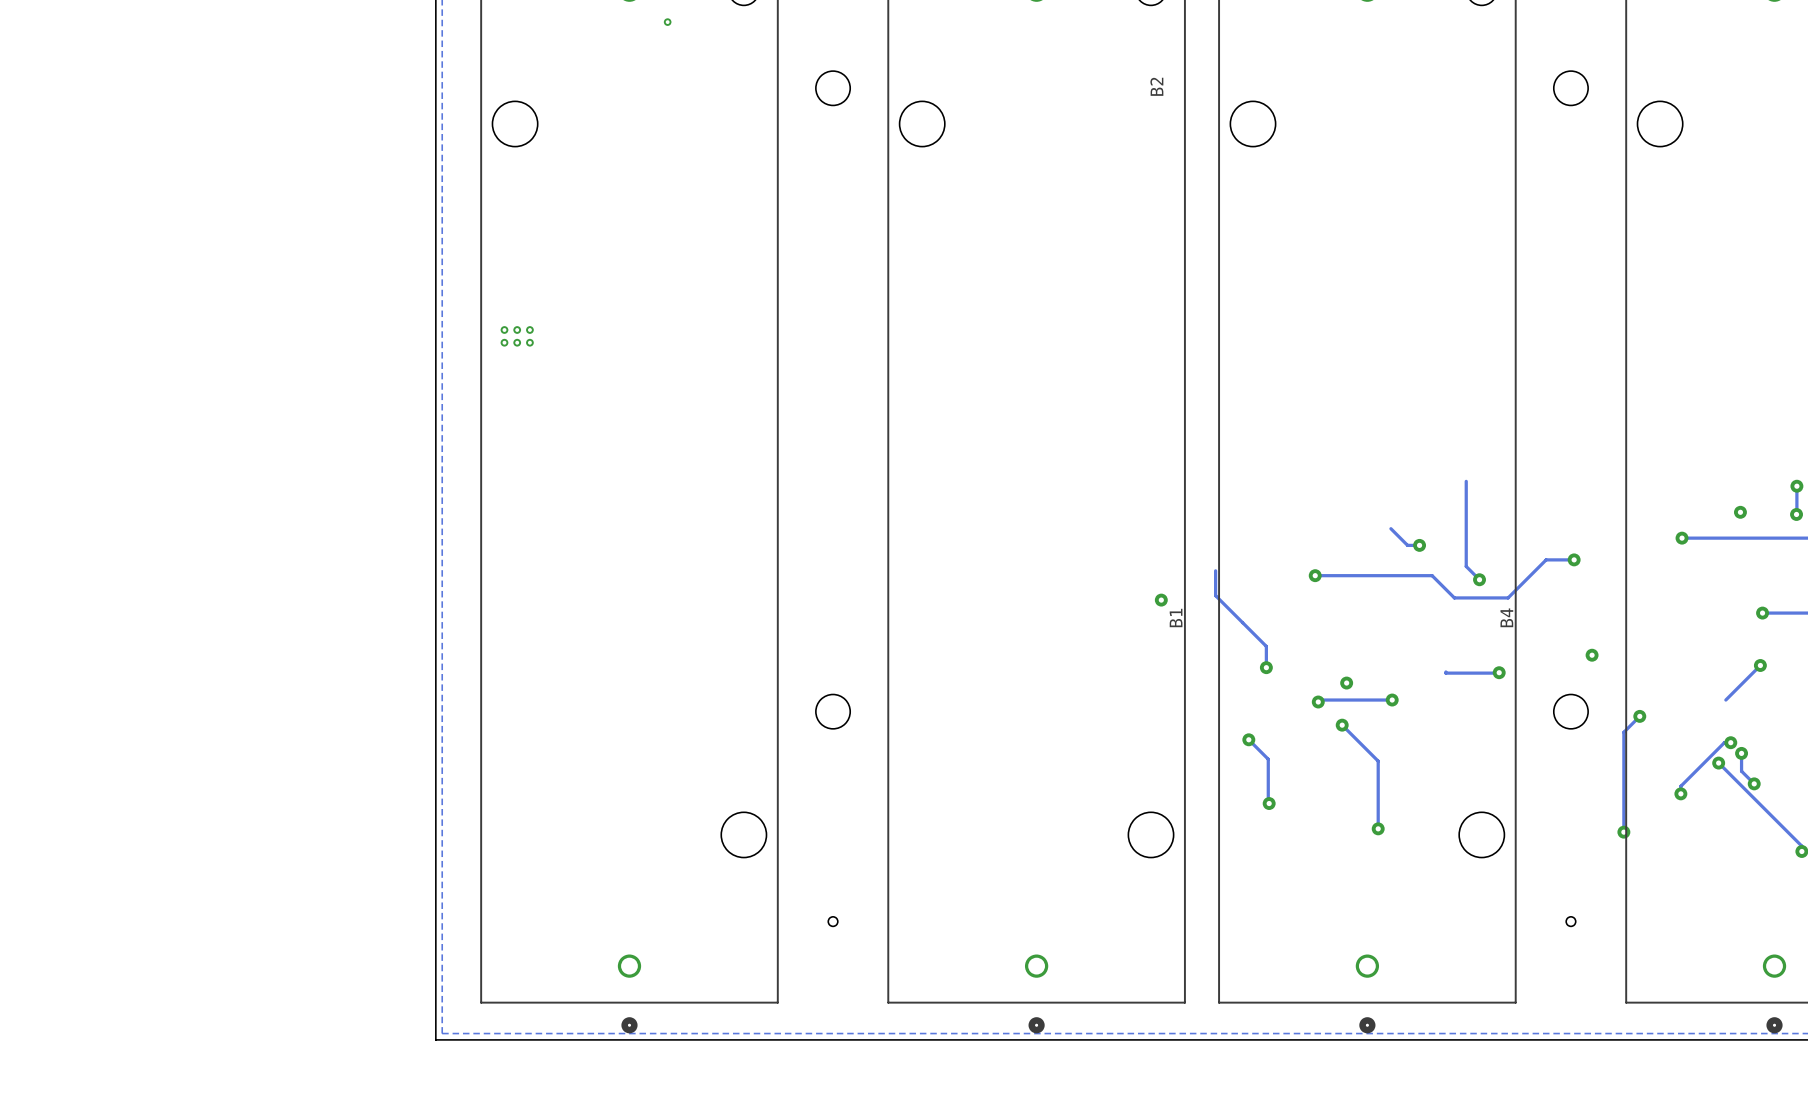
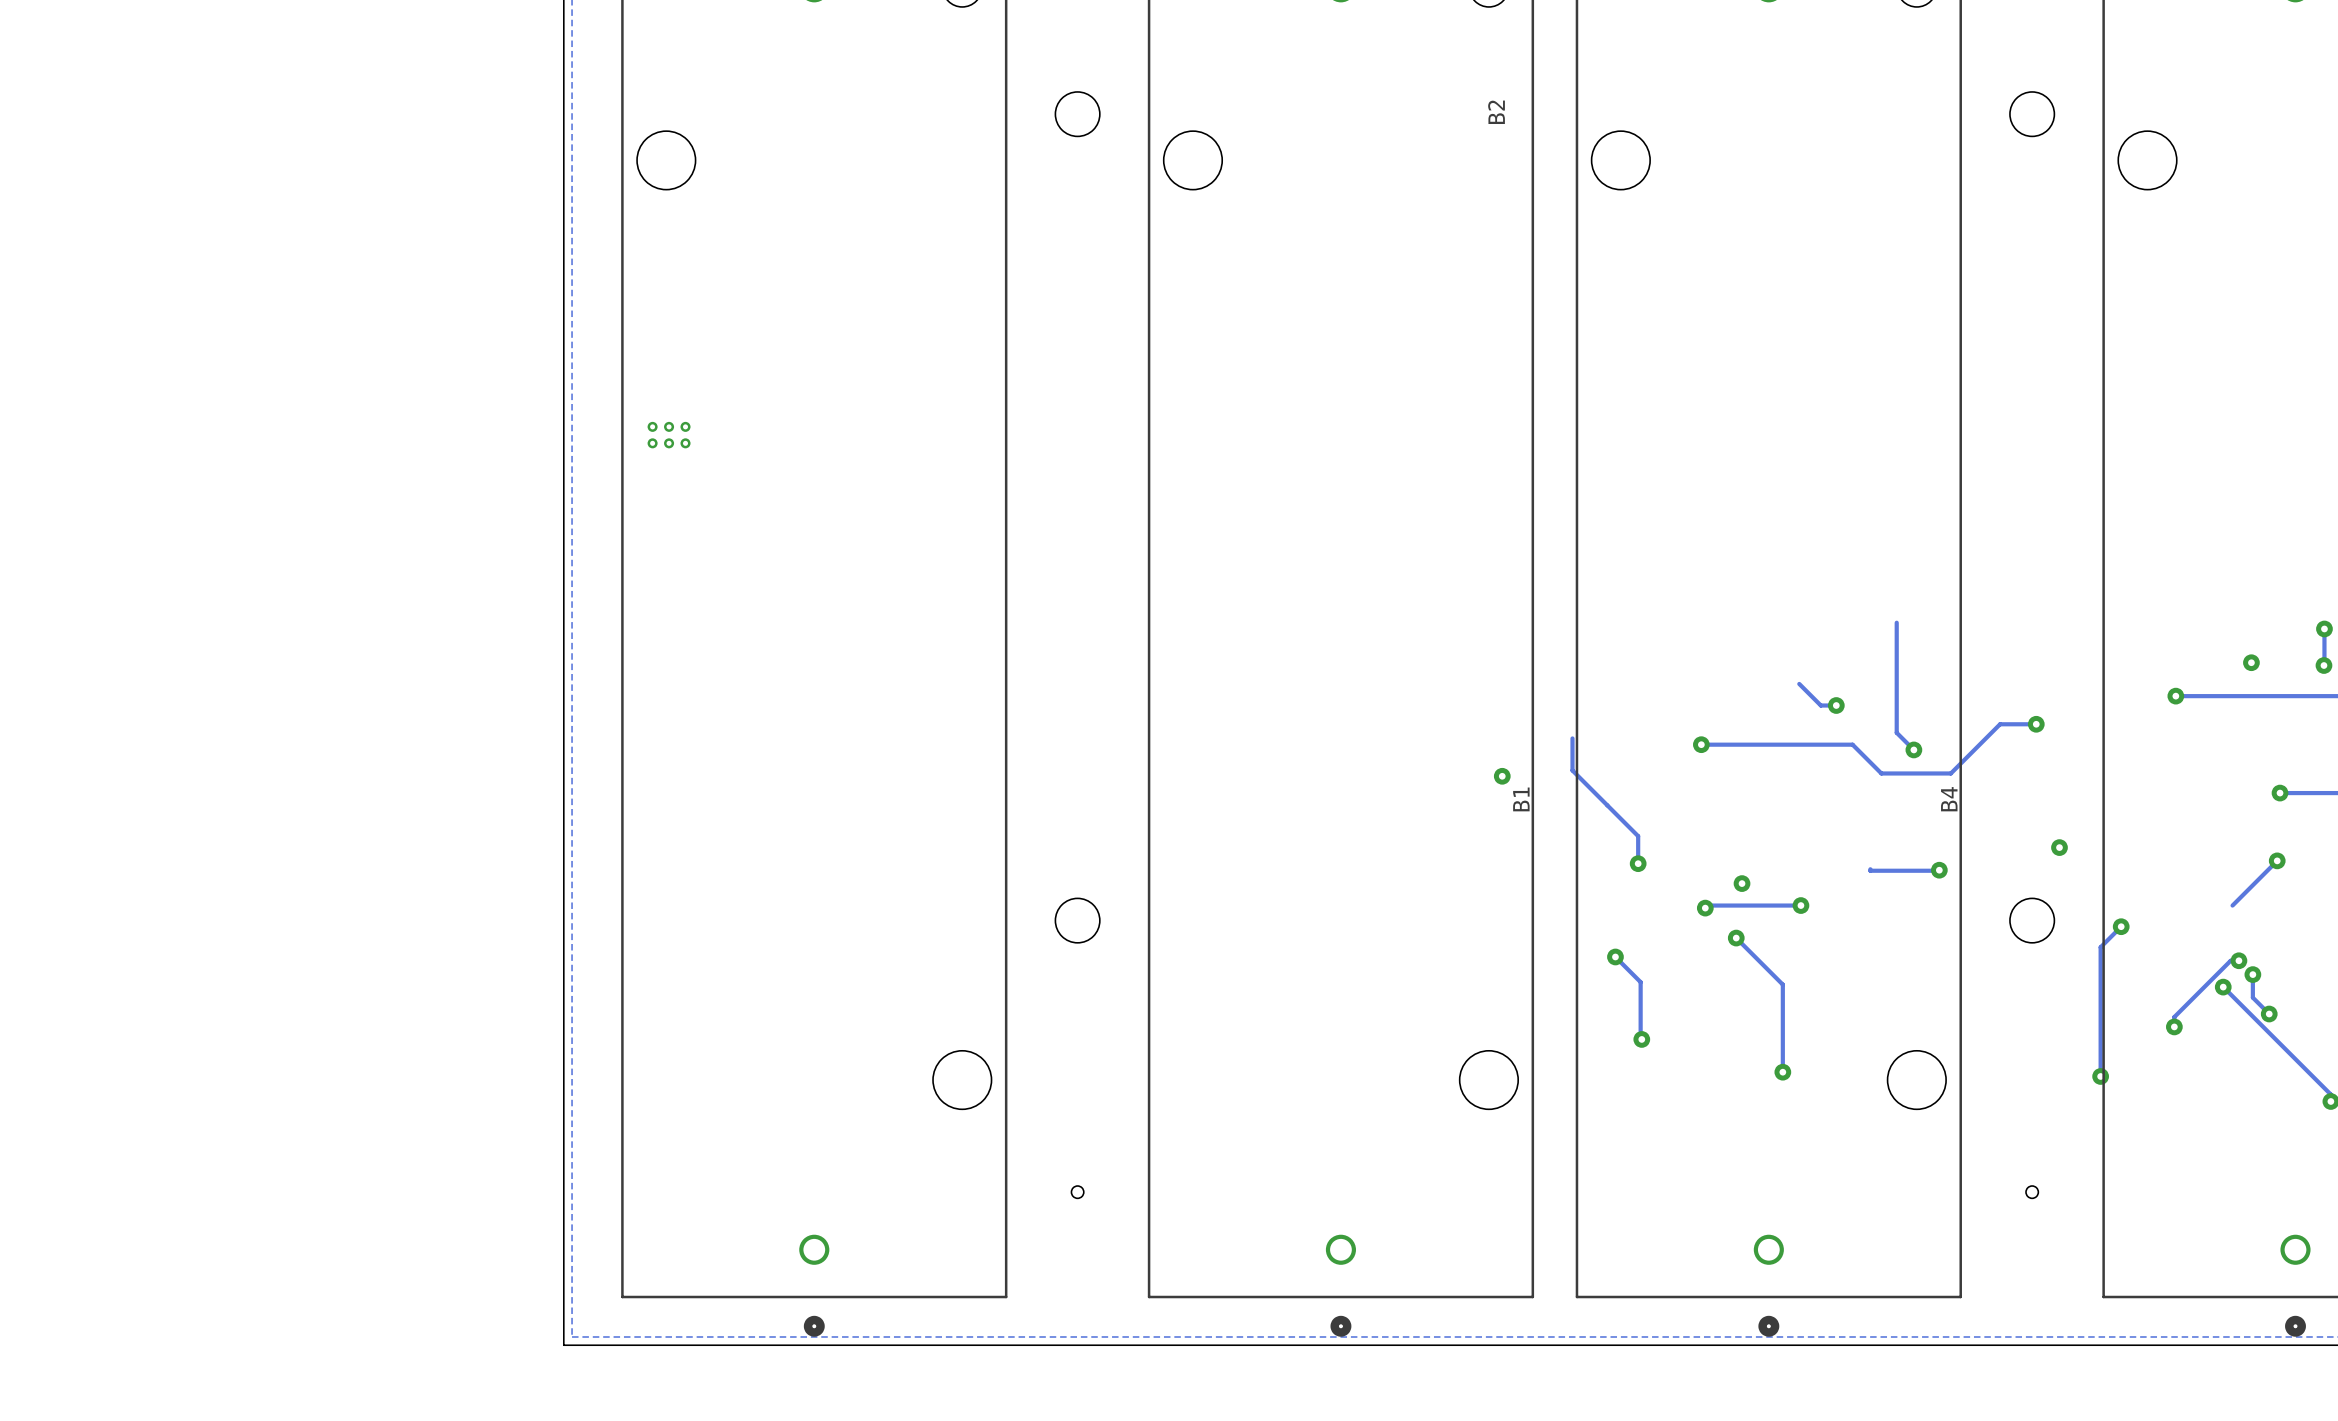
via: (667, 22) -> none

